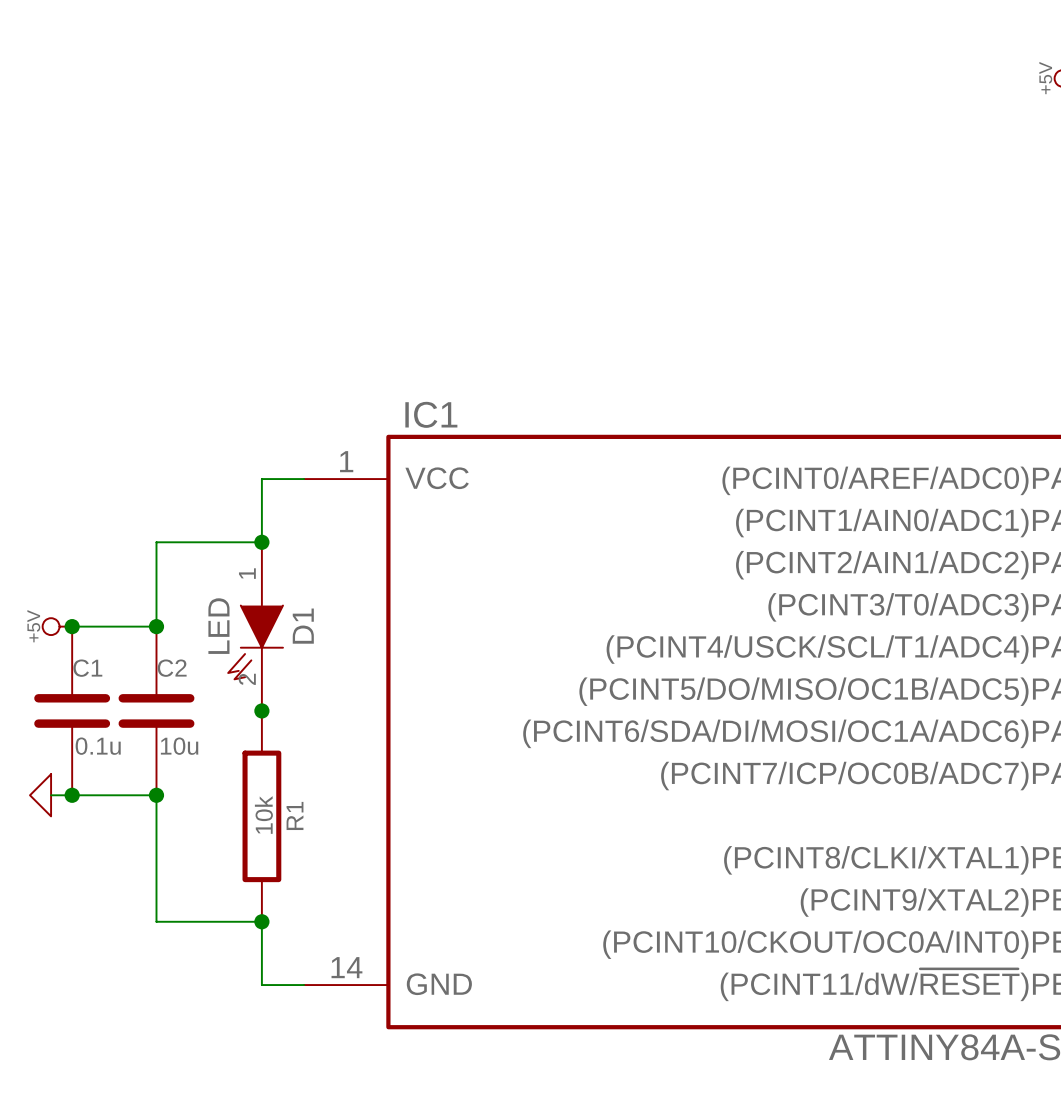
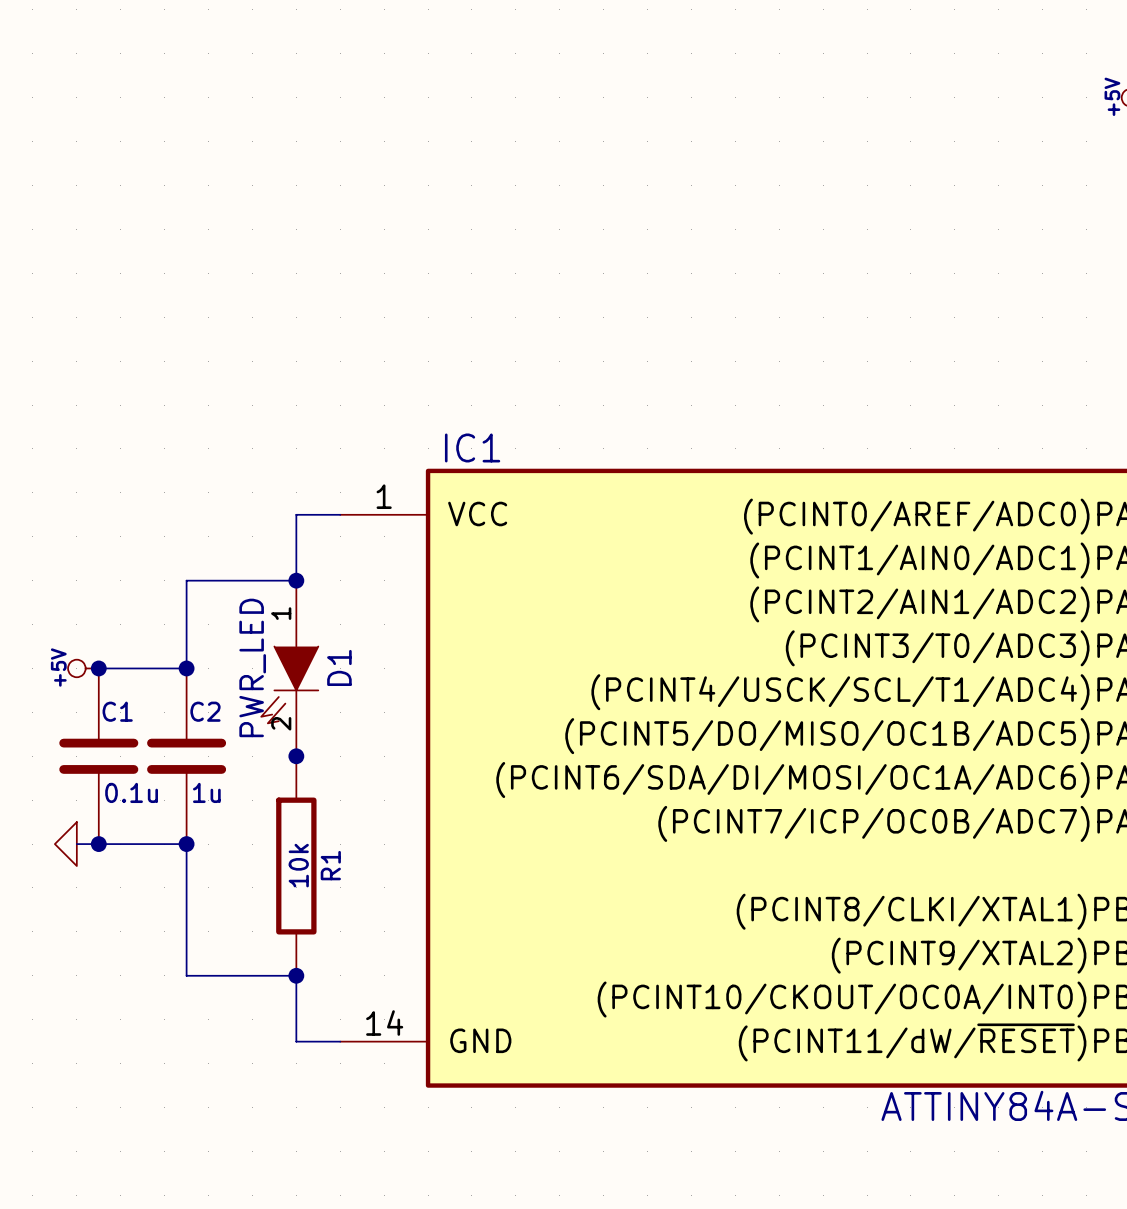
D1 value: LED (218, 626) -> PWR_LED (252, 667)
C2 value: 10u (179, 746) -> 1u (206, 792)

